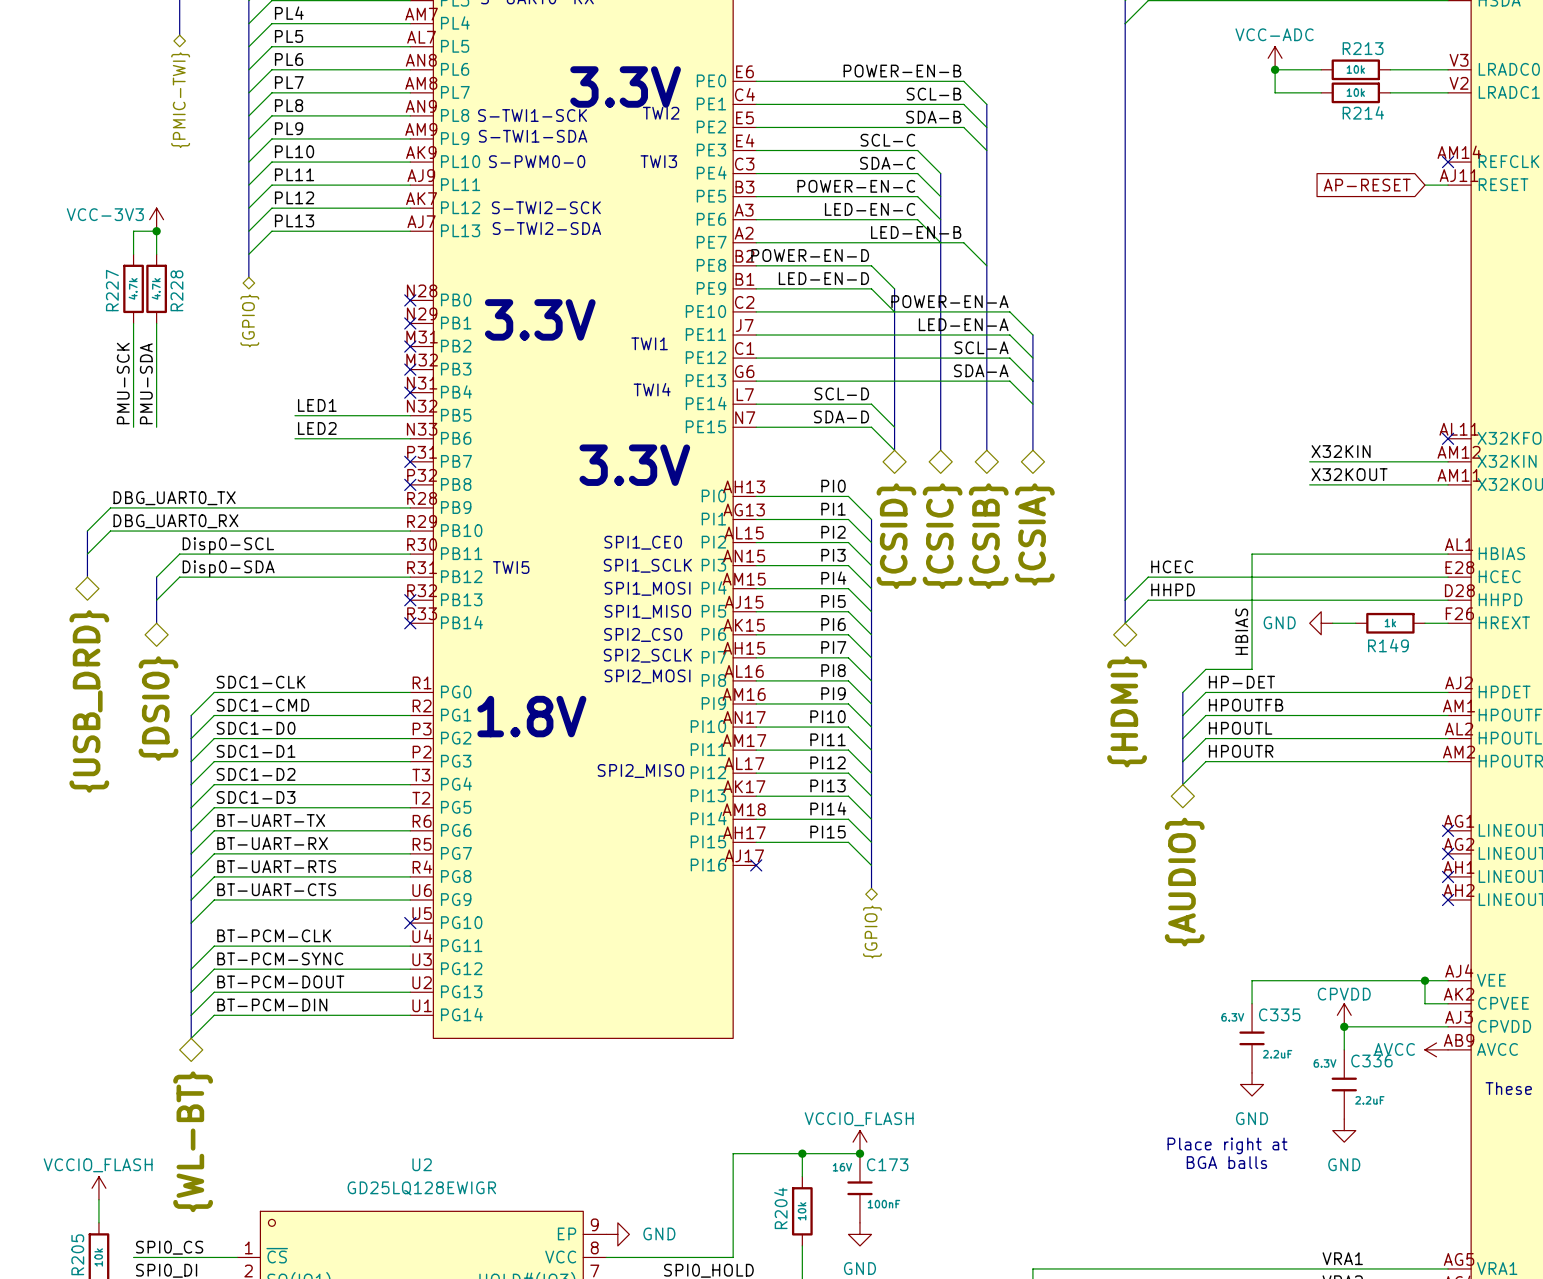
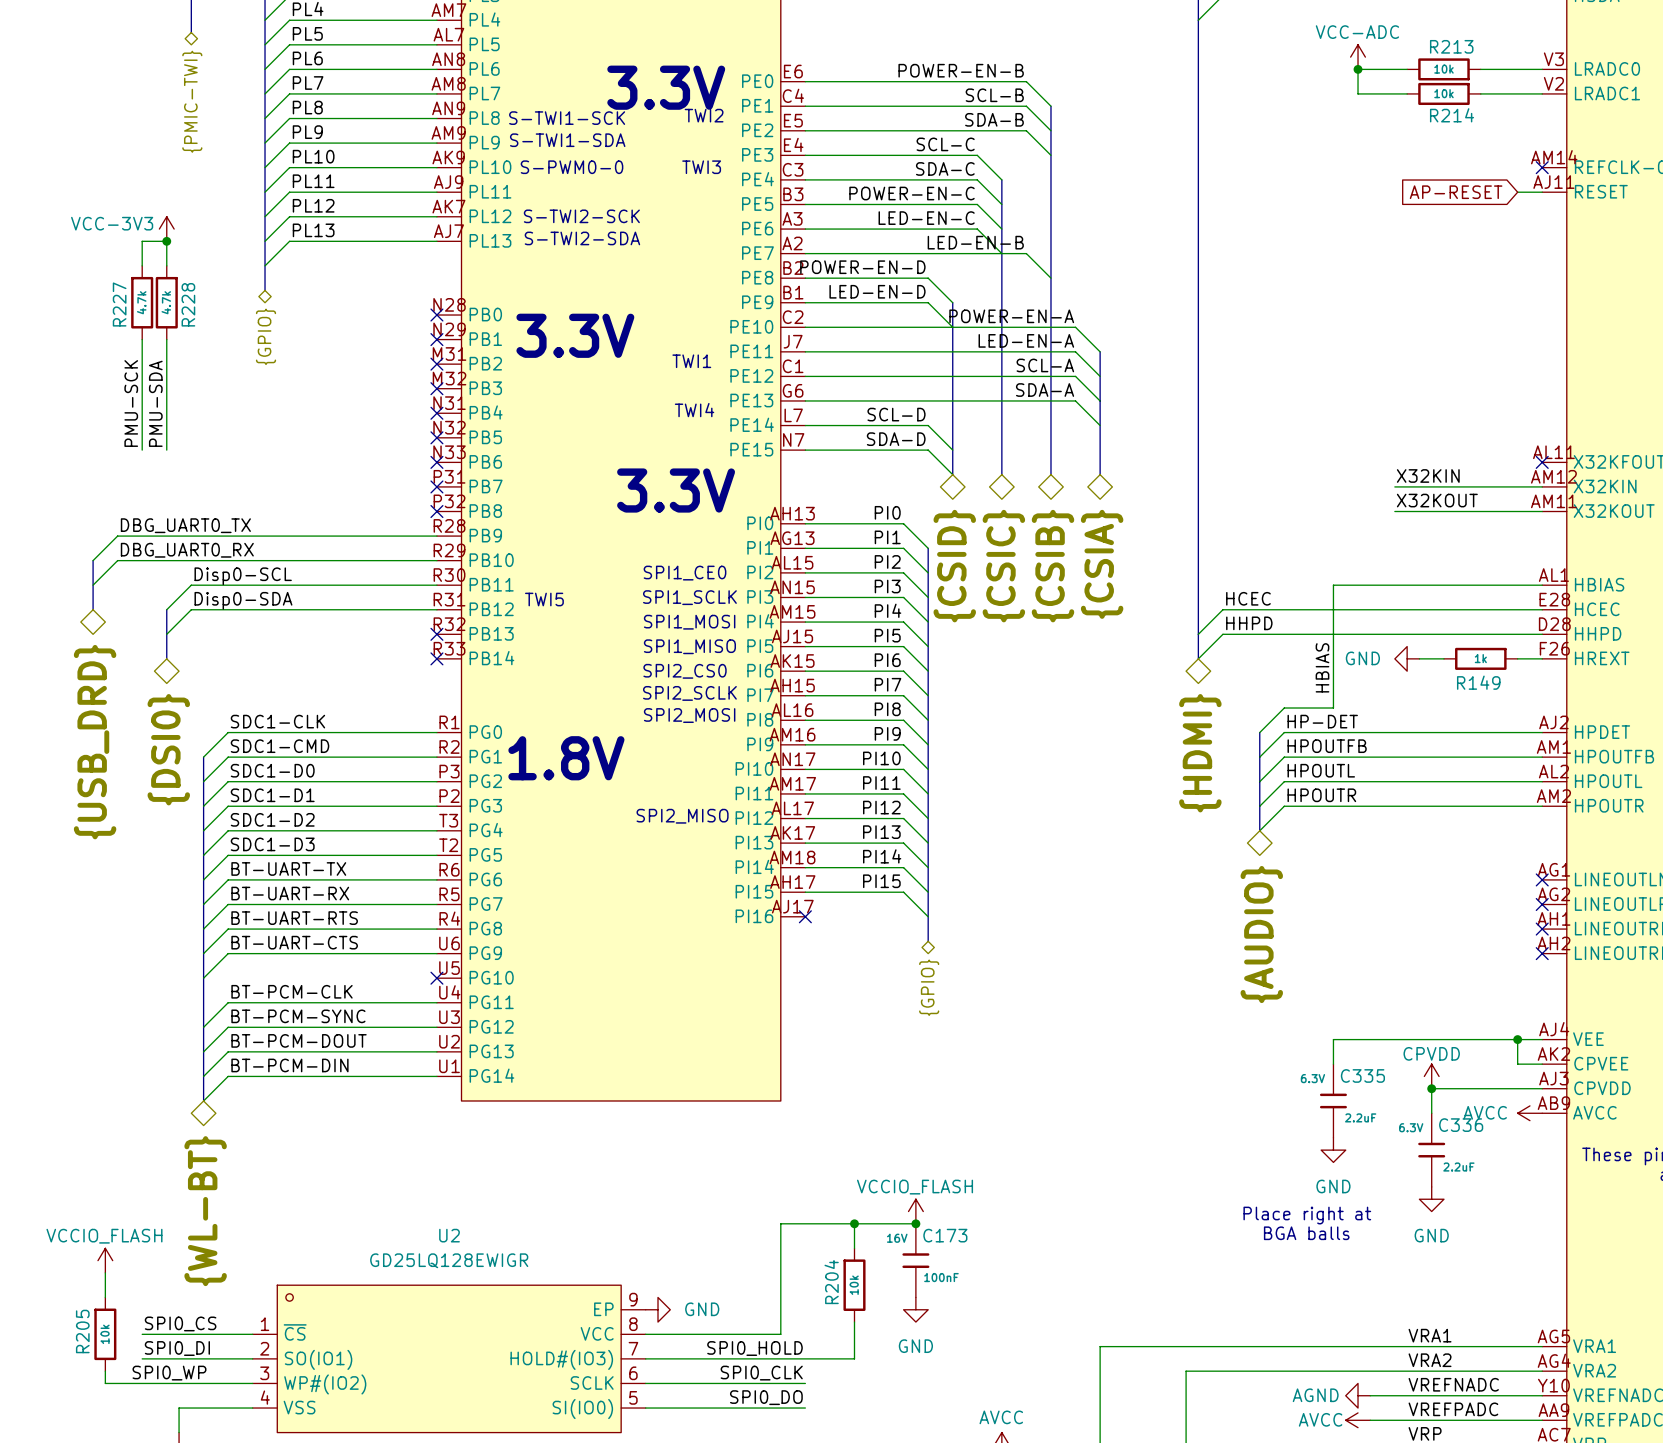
label: LED1 (317, 405) -> none
wire: (294, 415) (410, 415) -> none
no-connect mark: none -> (436, 437)
label: LED2 (317, 428) -> none
wire: (294, 438) (410, 438) -> none
no-connect mark: none -> (436, 462)

